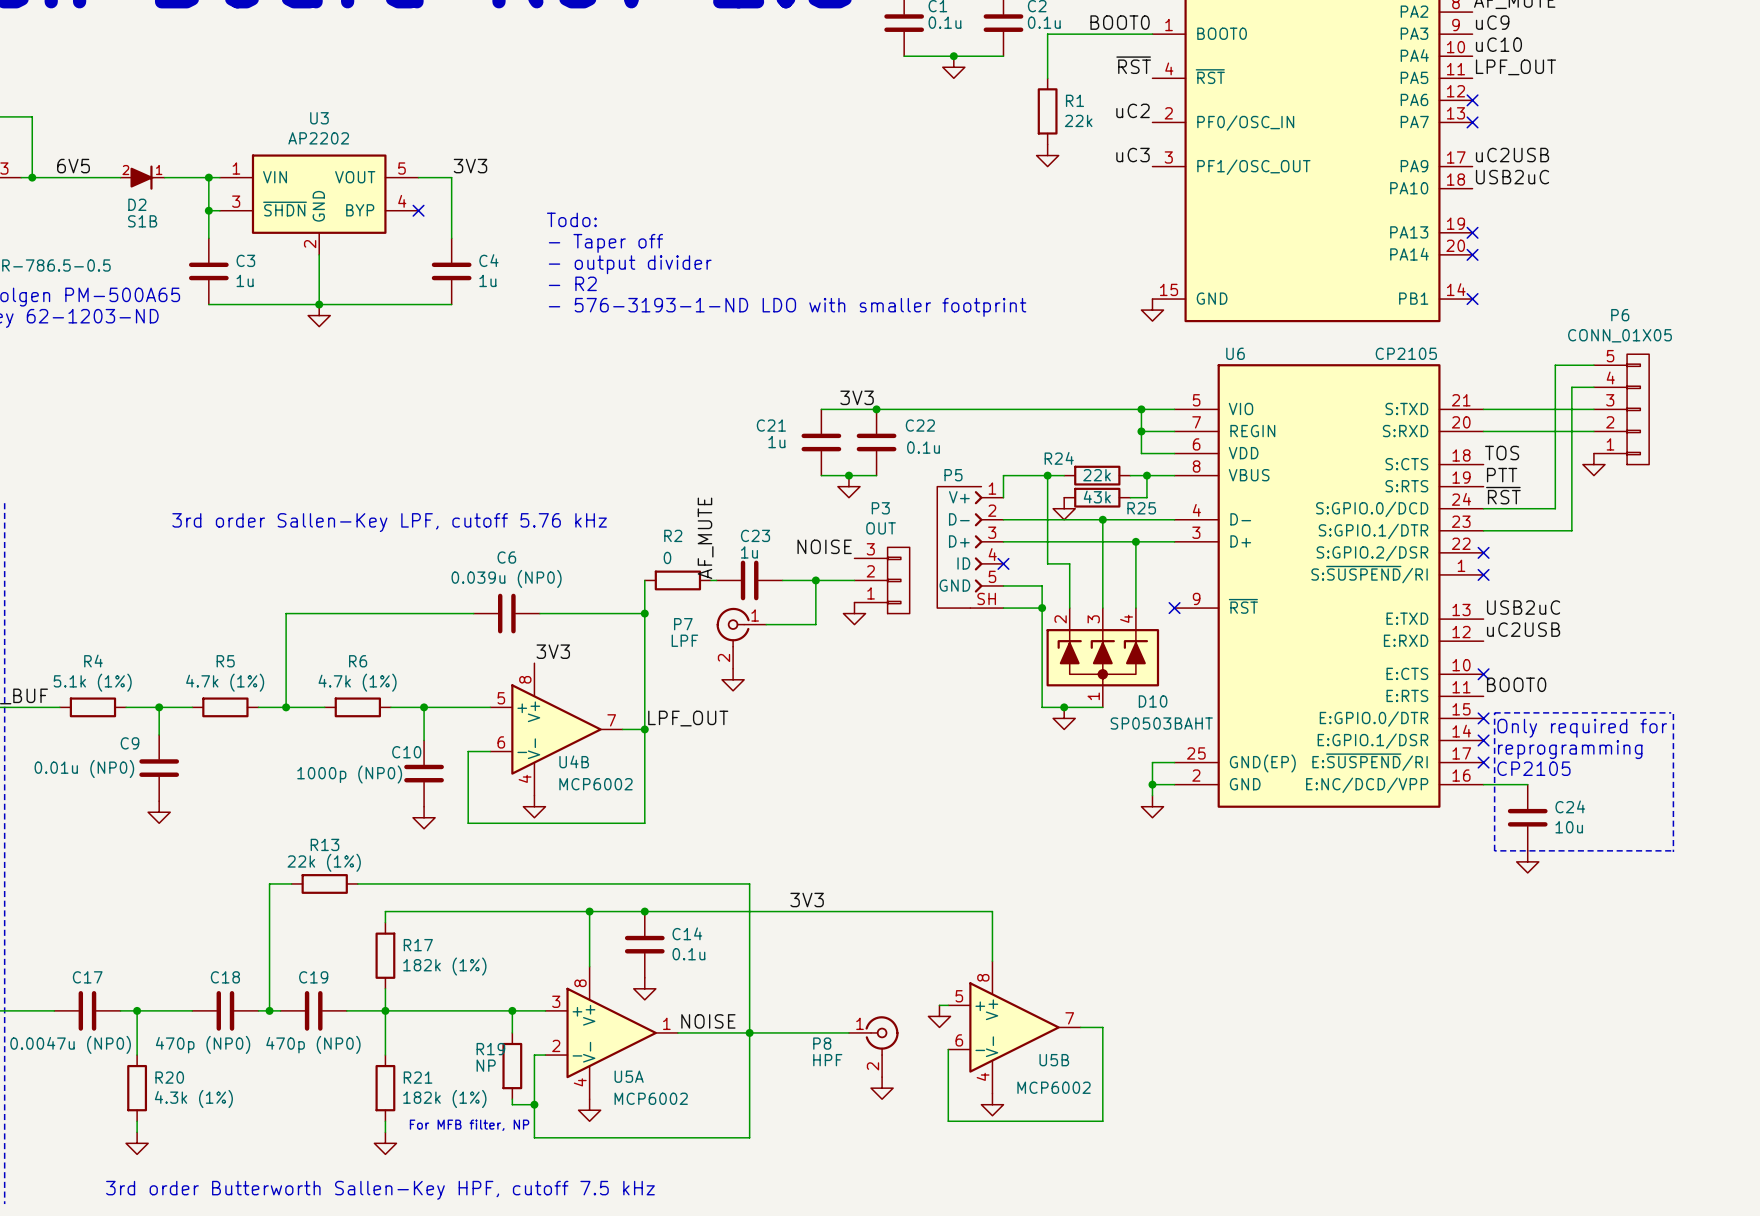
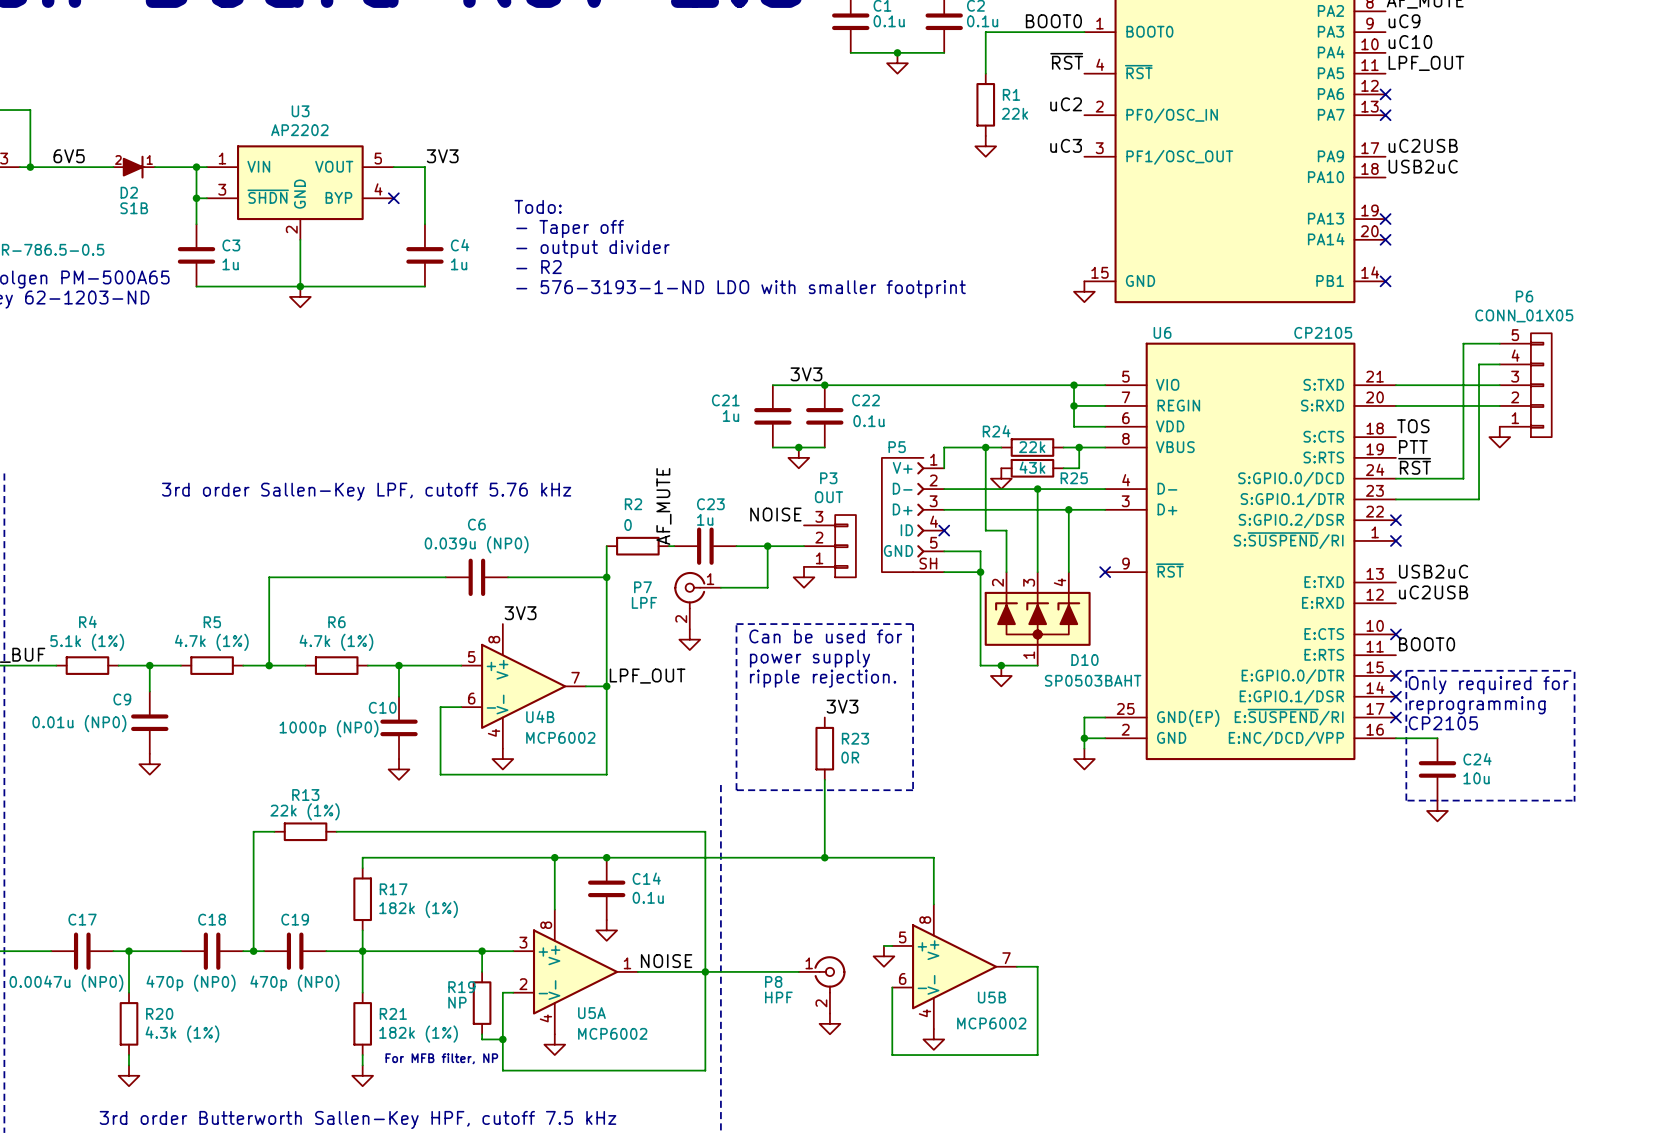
line: none -> (736, 624) (913, 624) (913, 790) (736, 790) (736, 624)
text: none -> Can be used for (825, 636)
text: none -> power supply (810, 658)
text: none -> ripple rejection. (823, 678)
R23: none -> 0R (824, 748)
wire: none -> (824, 779) (824, 857)
line: none -> (720, 785) (720, 1132)
label position: 3V3 (807, 900) -> 3V3 (842, 706)
junction: none -> (824, 857)

